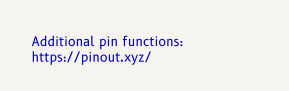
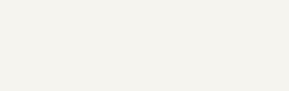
text: Additional pin functions: (107, 42) -> none
text: https://pinout.xyz/ (91, 58) -> none

